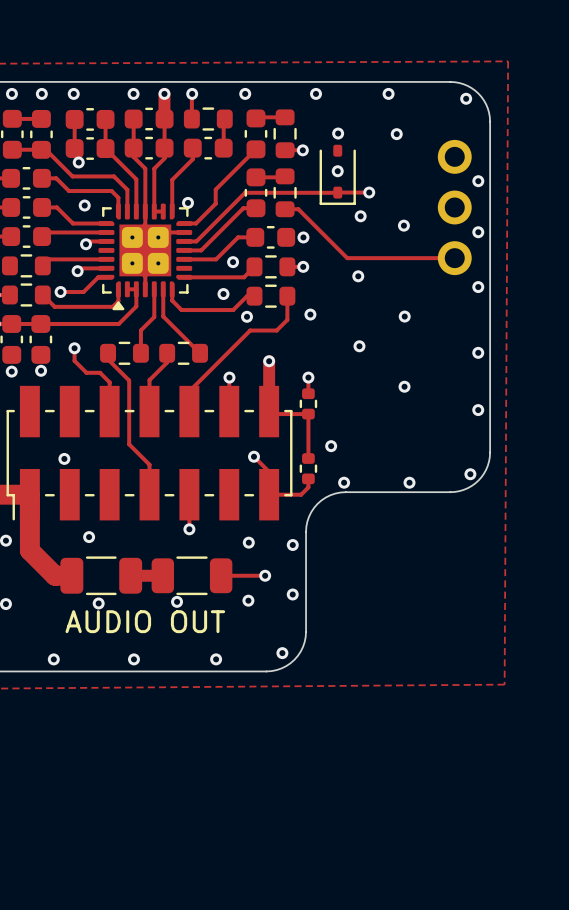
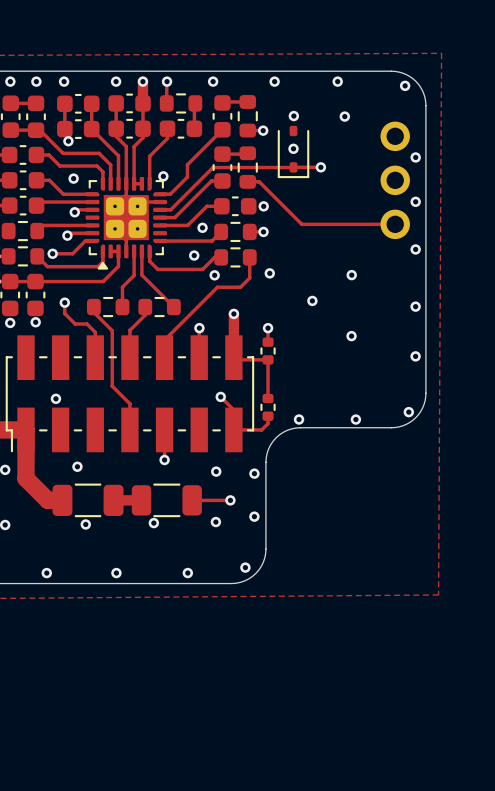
via: (360, 216) -> none
via: (403, 225) -> none
via: (358, 276) -> none
via: (331, 446) -> none
text: AUDIO OUT (145, 621) -> none

